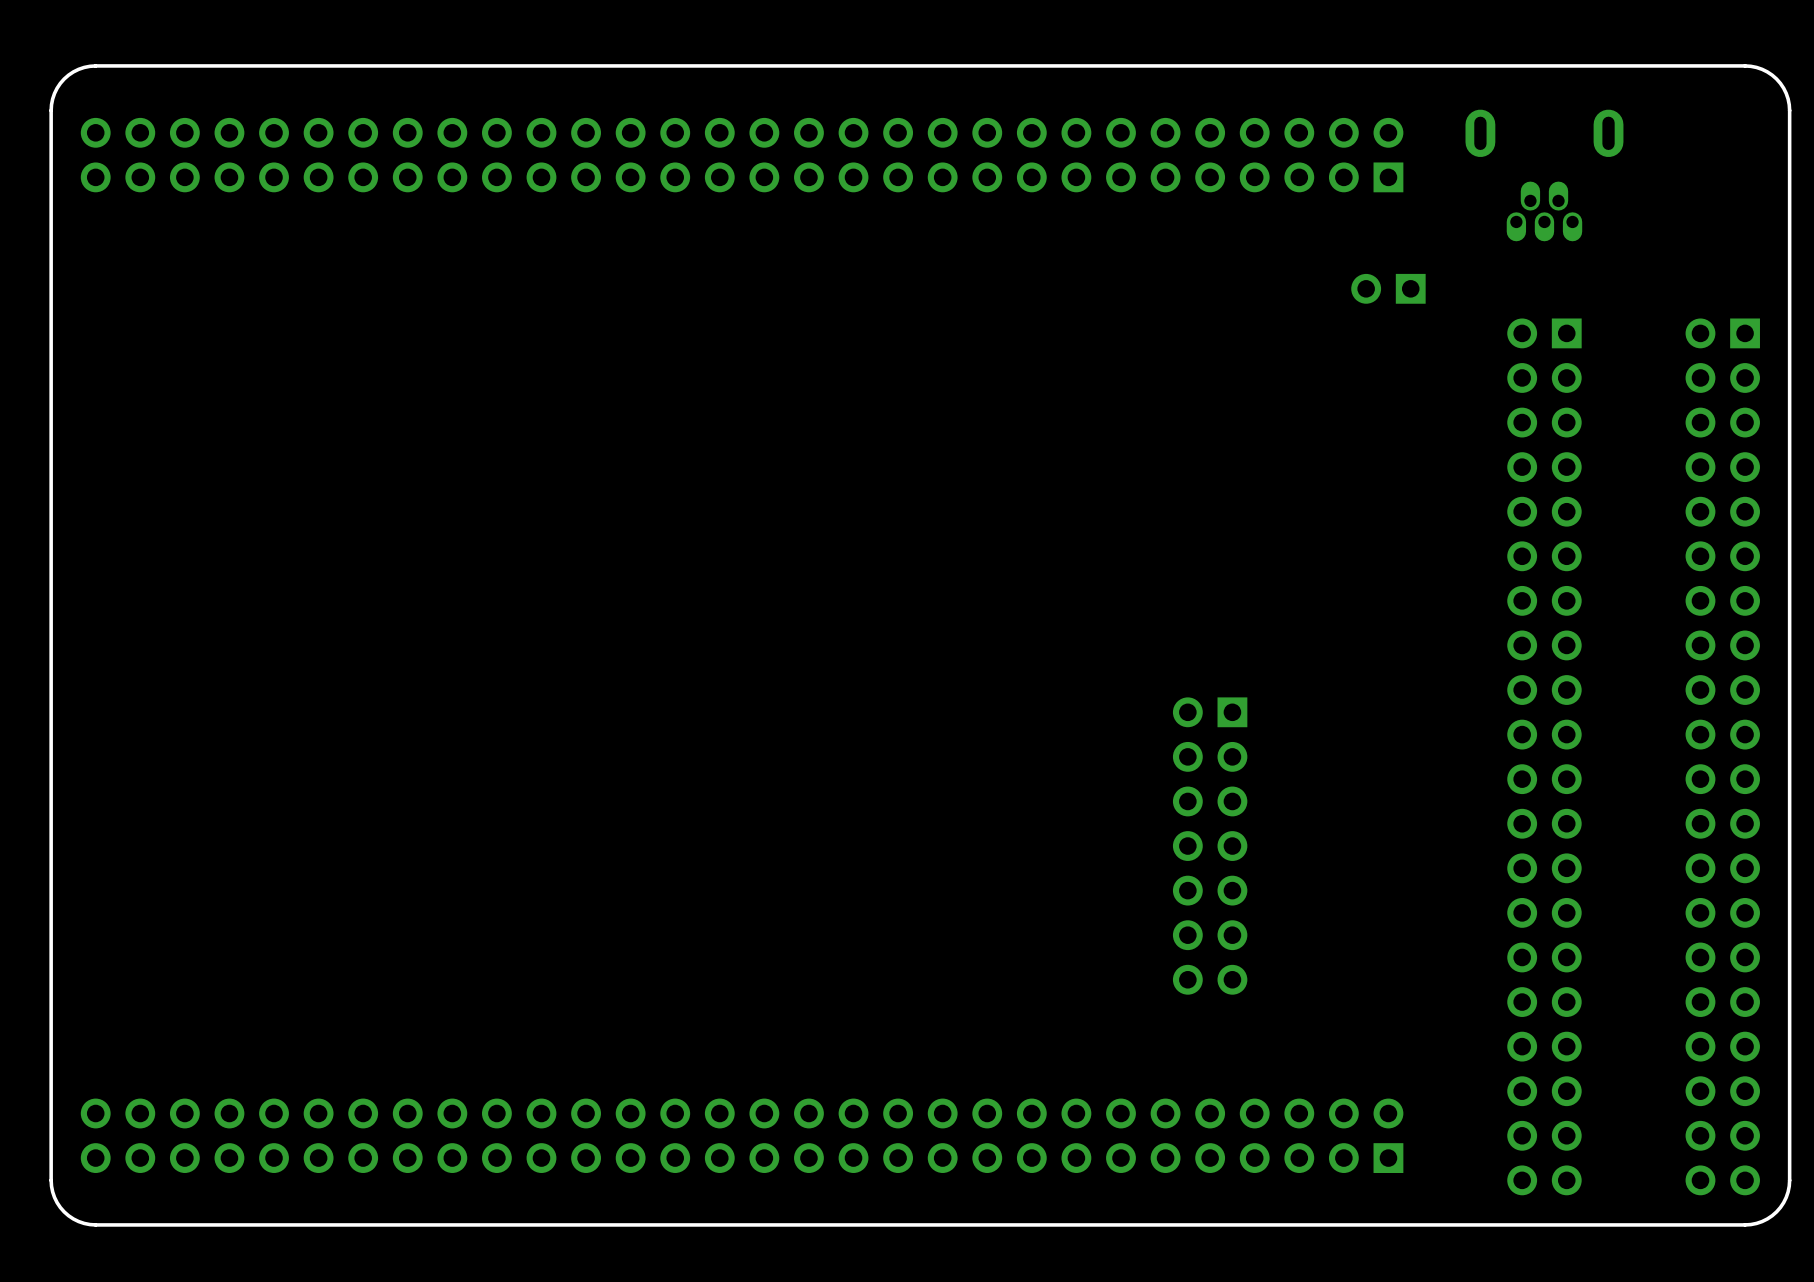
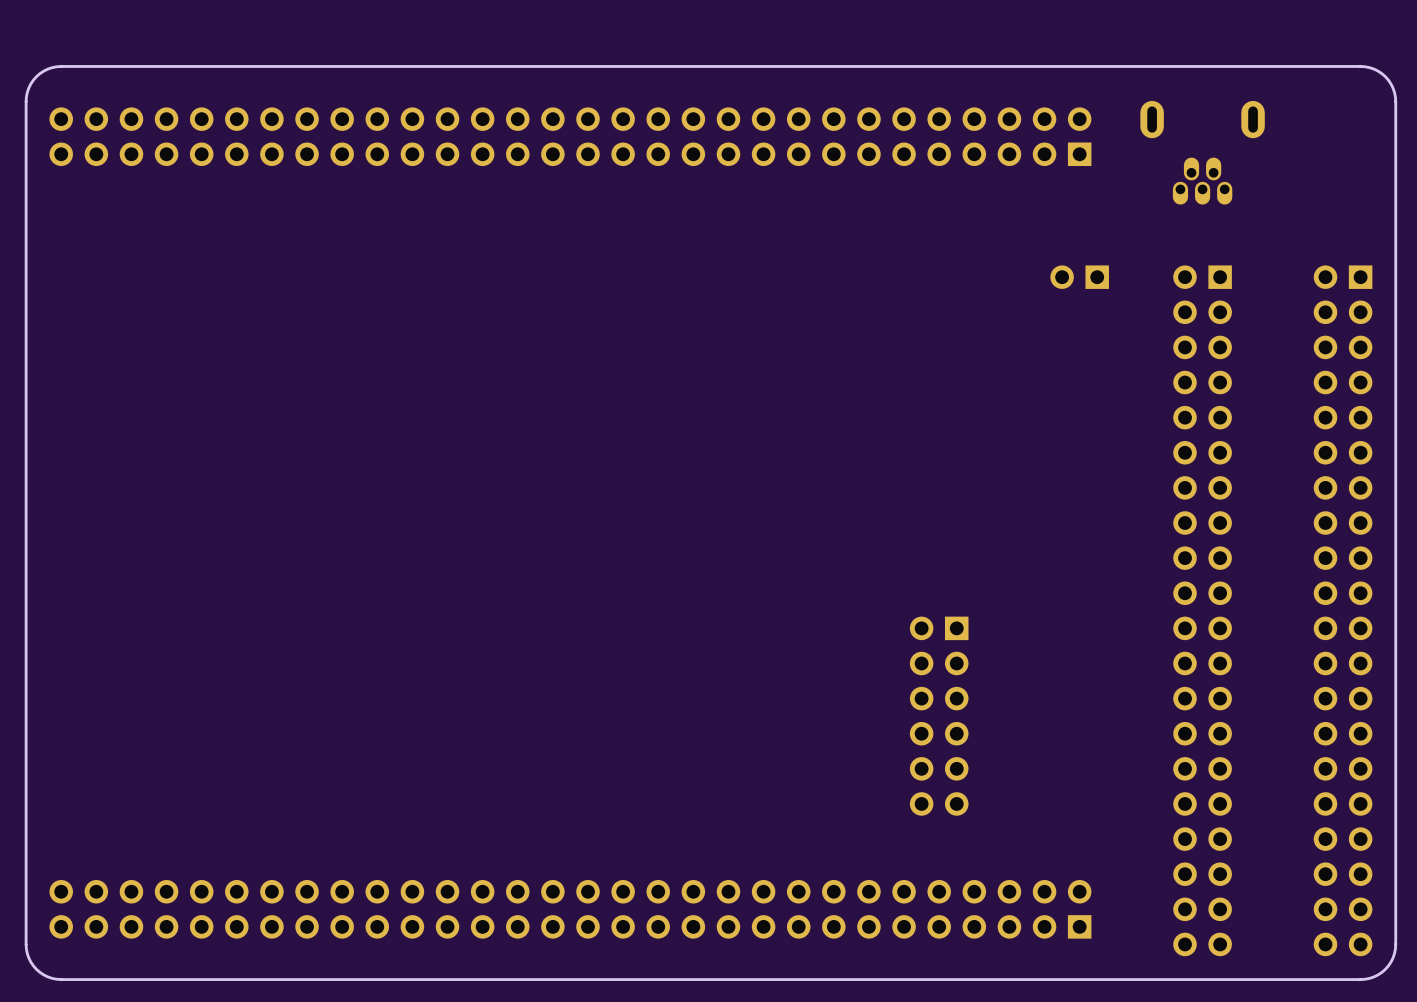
part position: (1388, 288) -> (1079, 277)
part: (1210, 846) -> none
part: none -> (939, 716)

